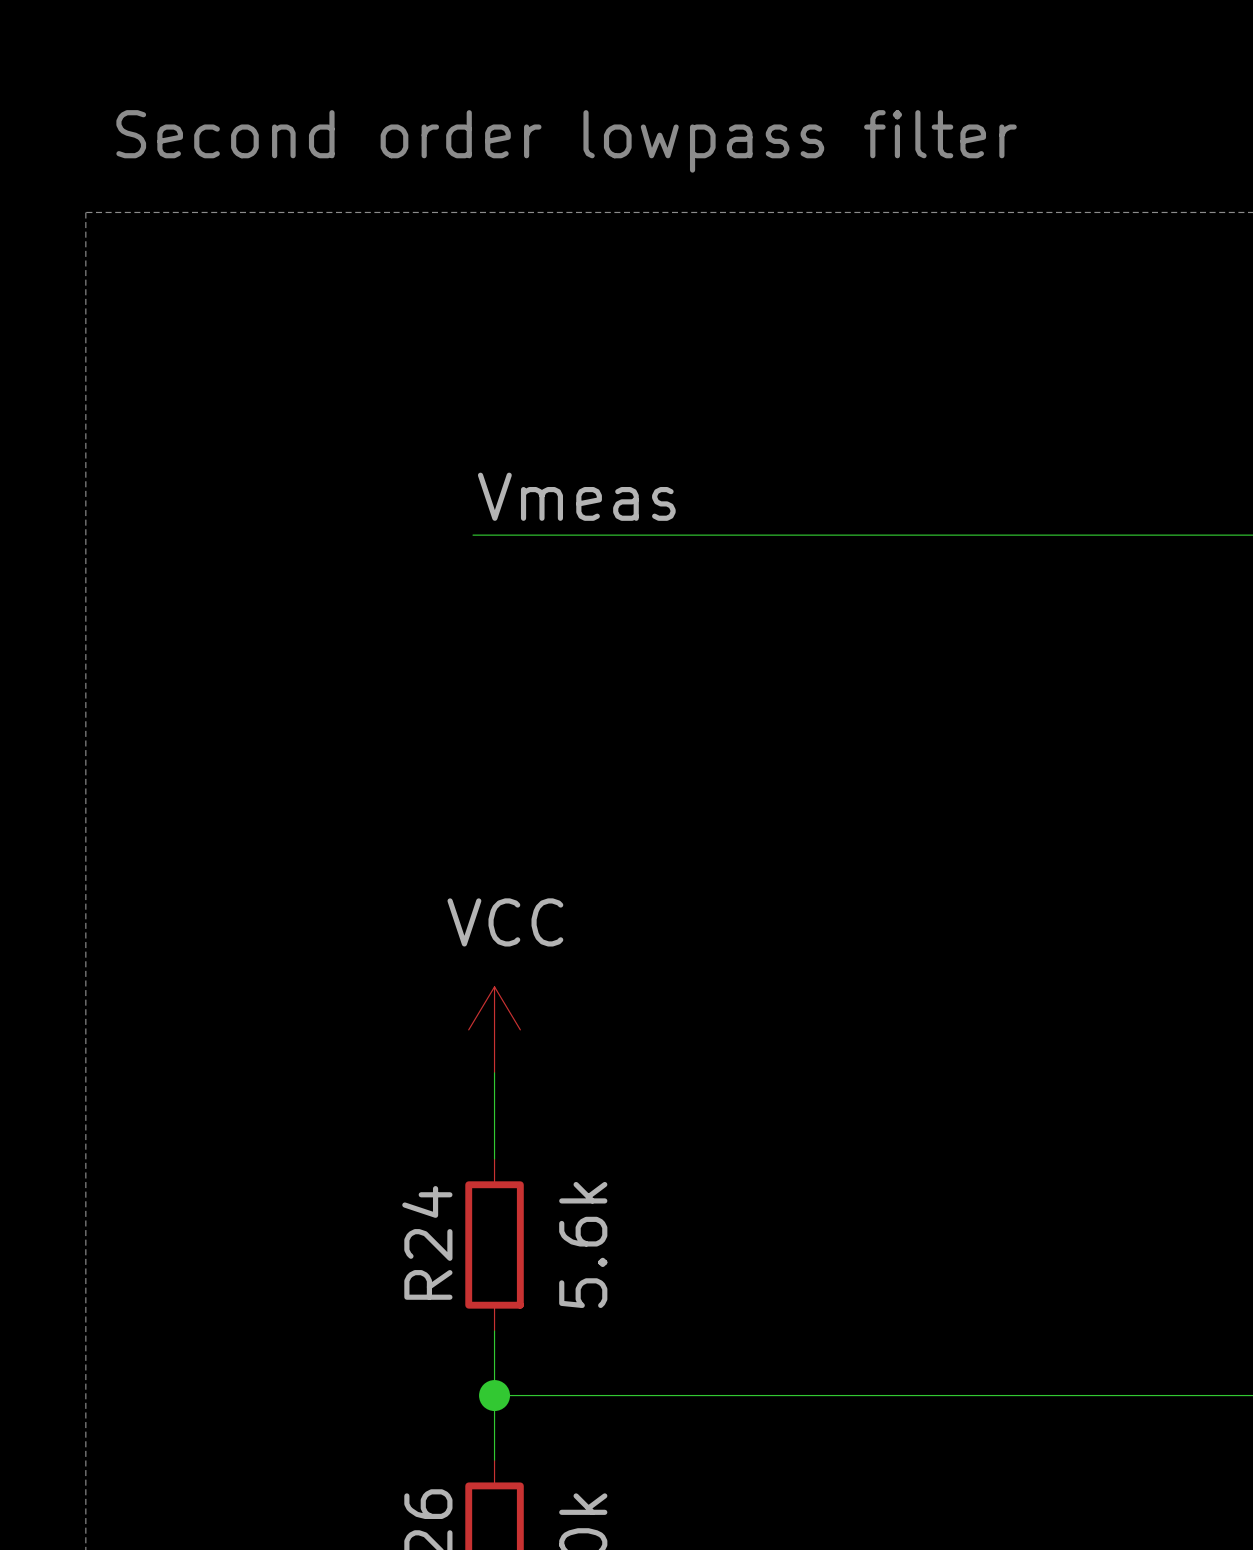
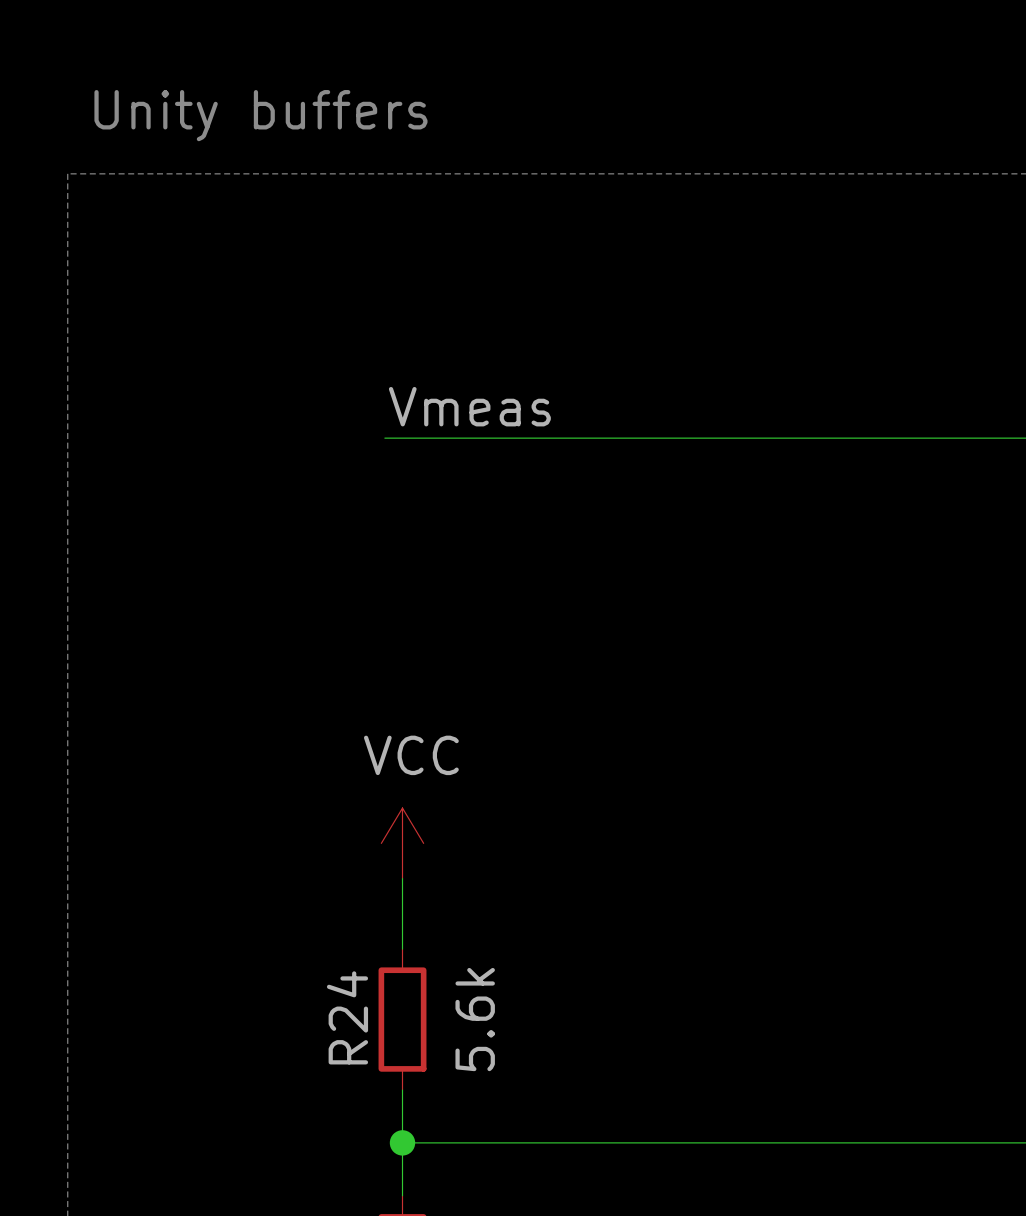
text: Second order lowpass filter (566, 141) -> Unity buffers (260, 115)

